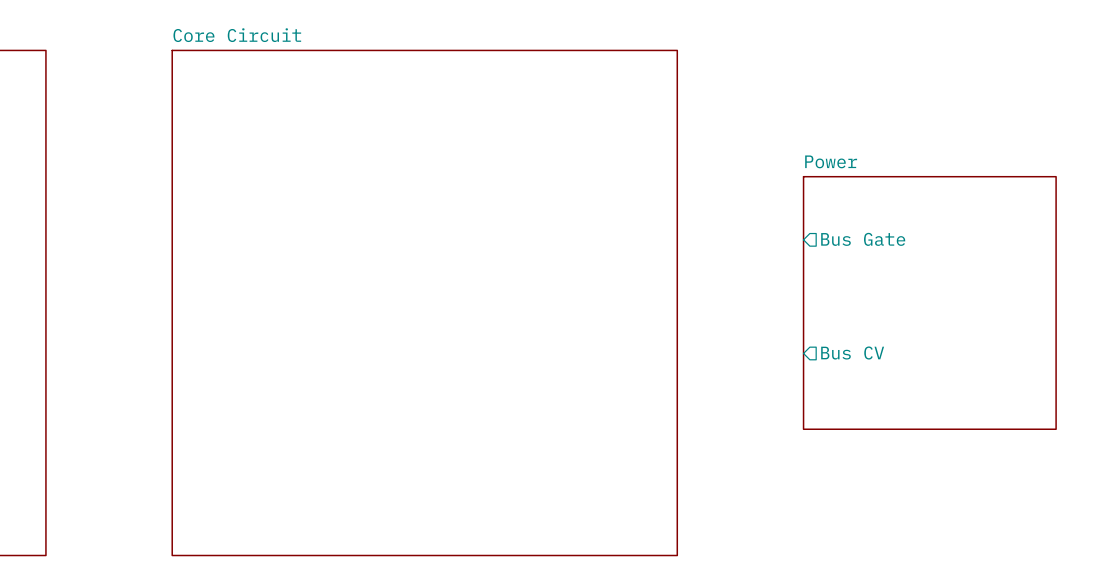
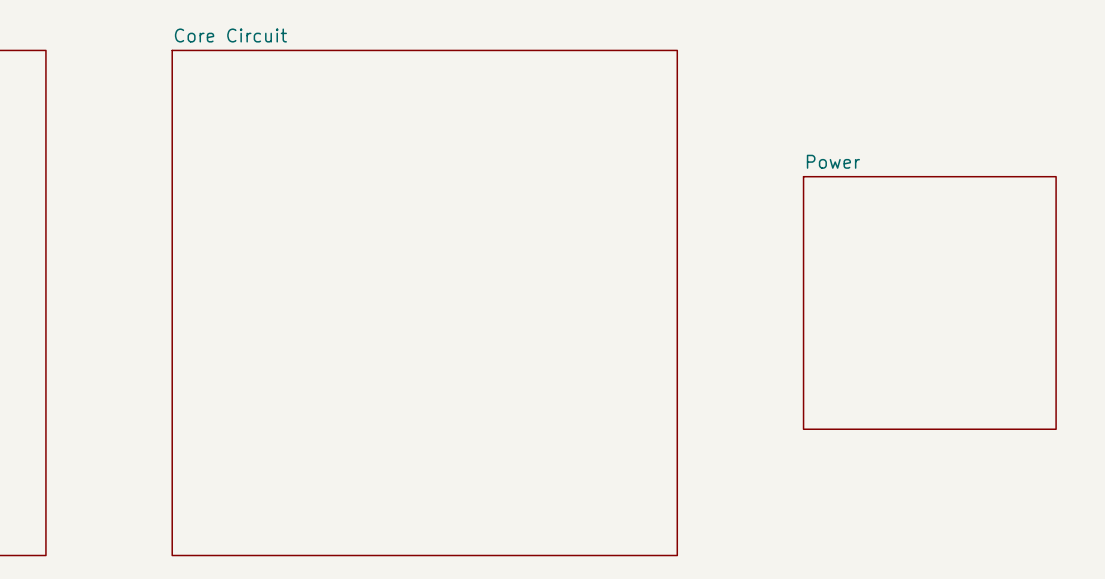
sheet pin: Bus Gate (863, 239) -> none
sheet pin: Bus CV (852, 353) -> none

